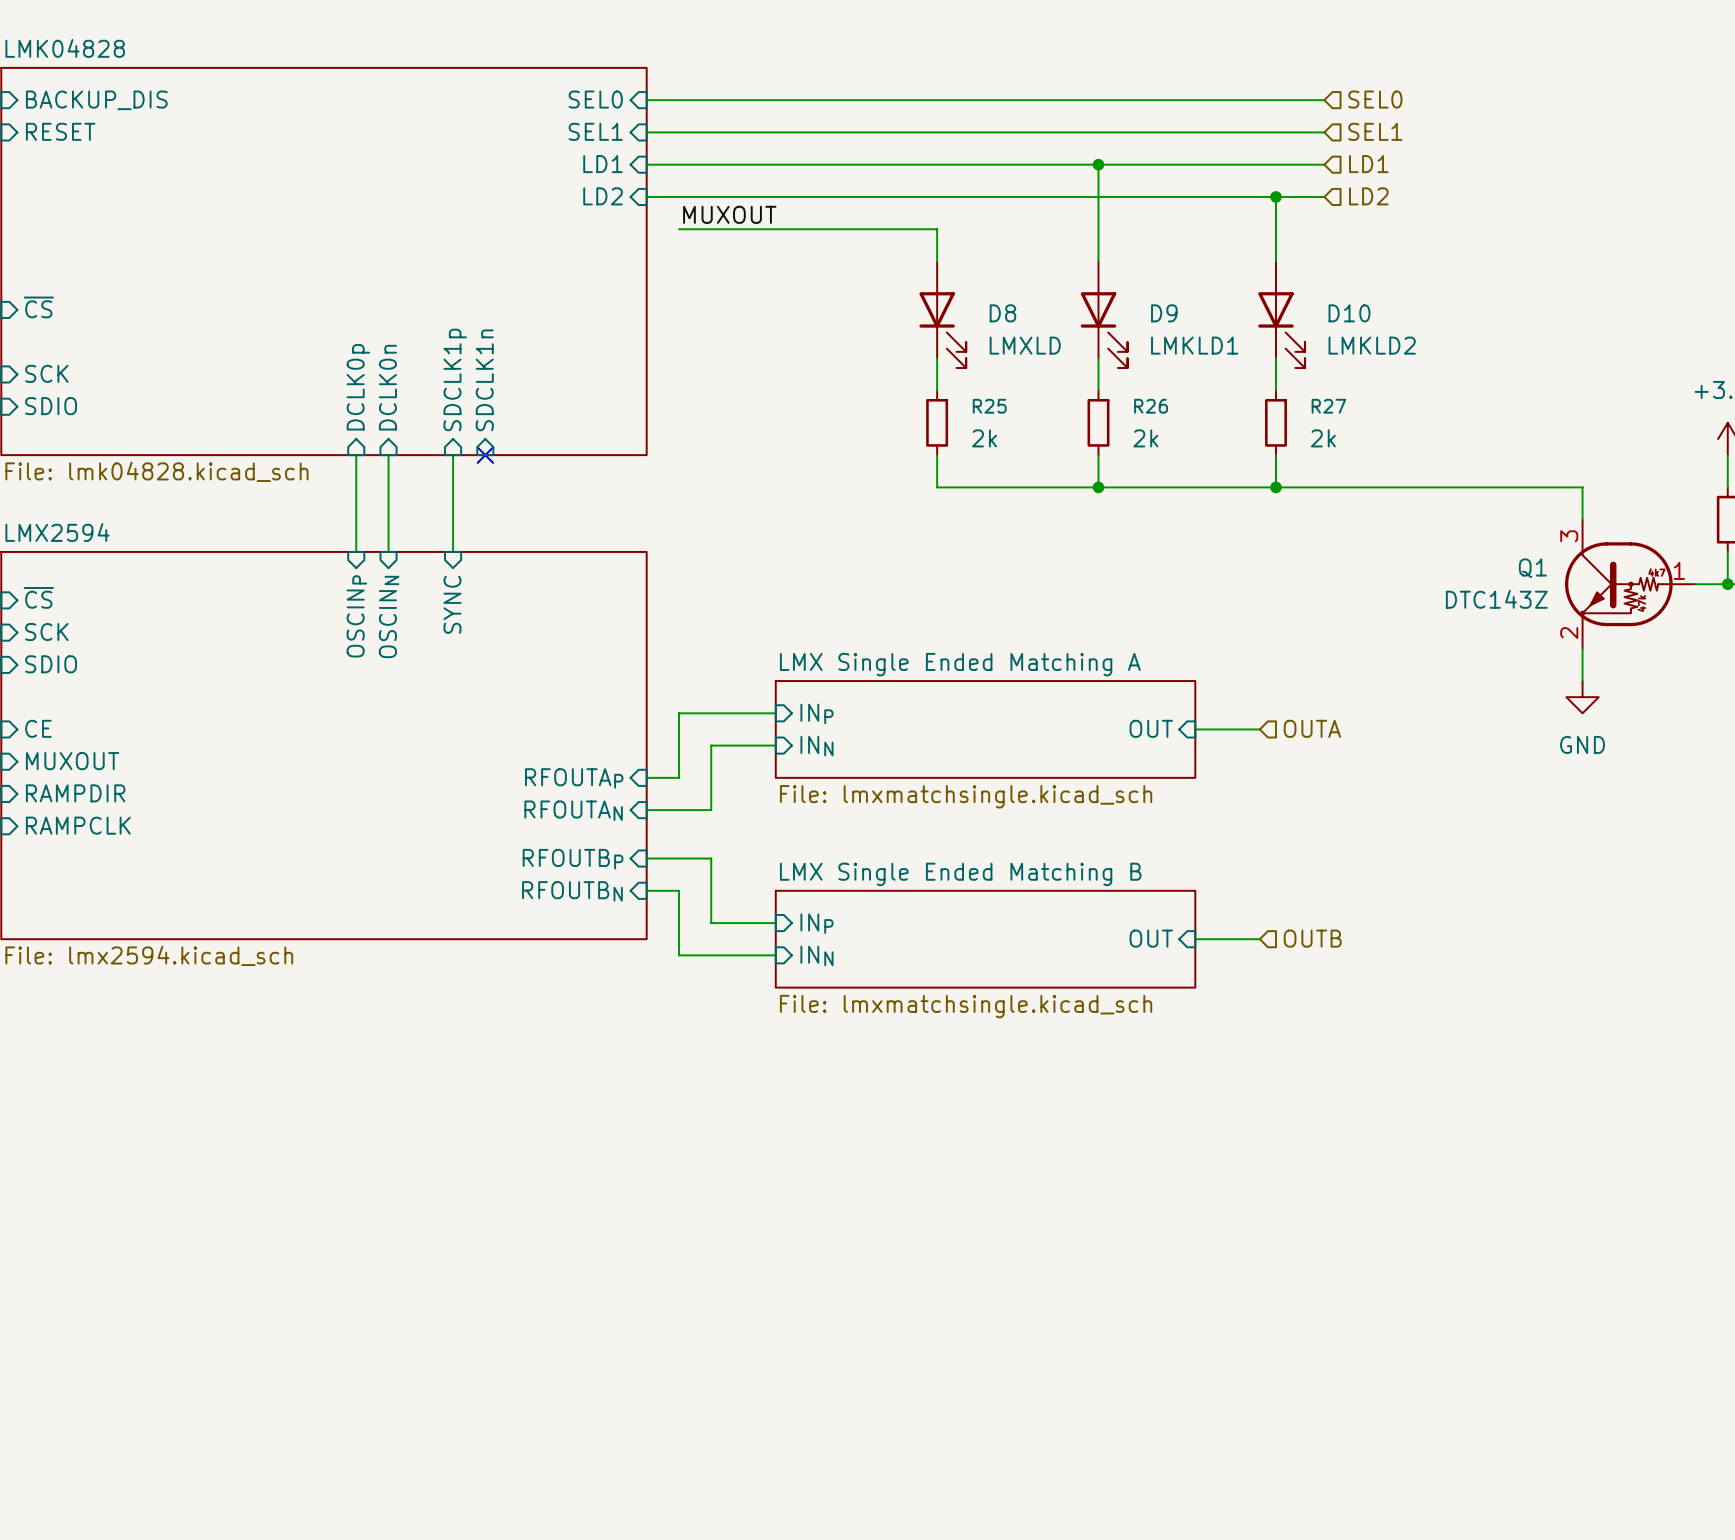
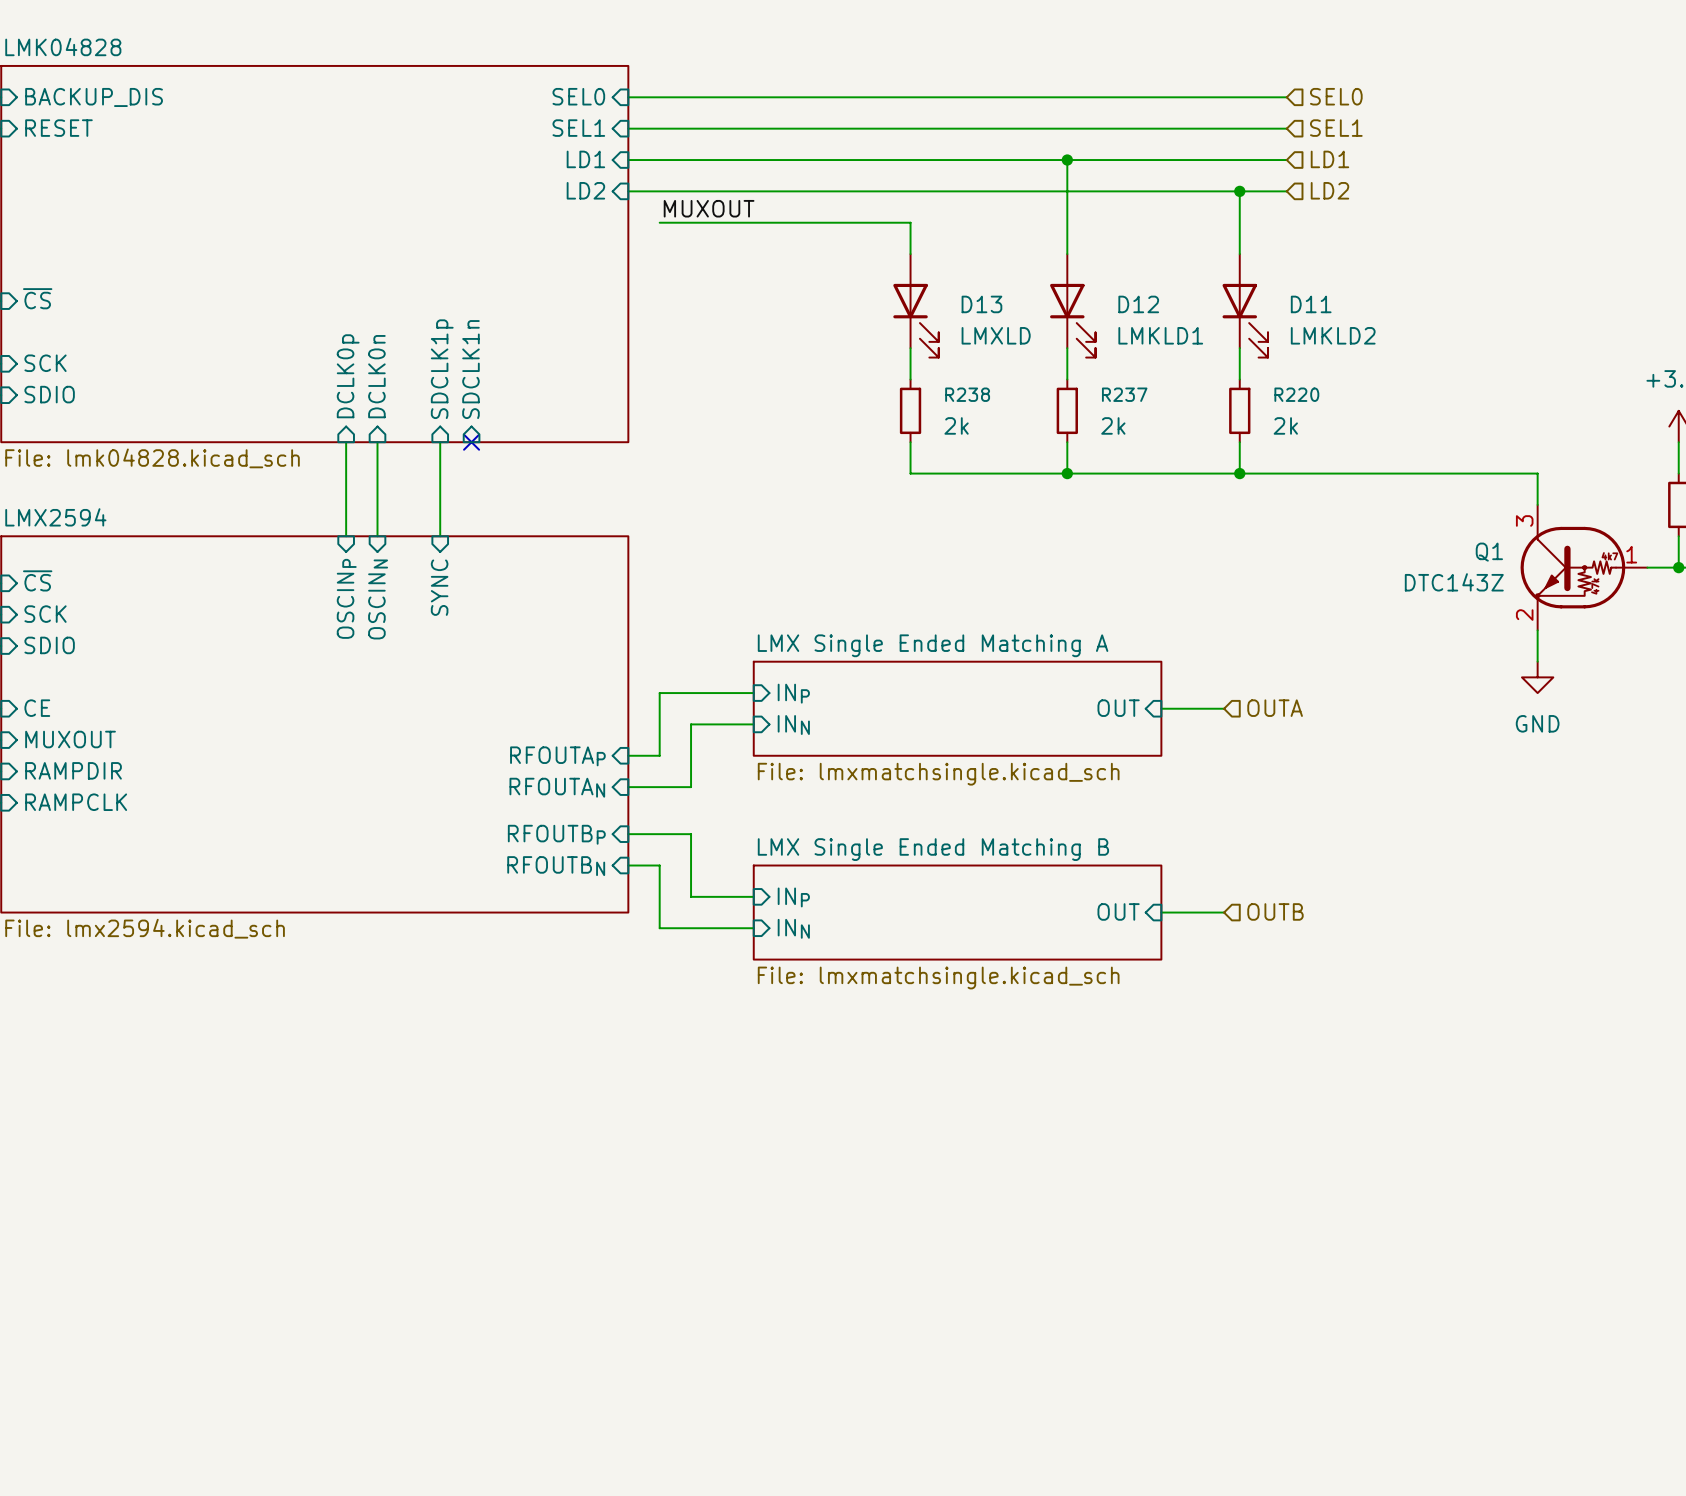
D8 name: D8 (1002, 313) -> D13 (981, 304)
D9 name: D9 (1164, 313) -> D12 (1138, 304)
D10 name: D10 (1349, 313) -> D11 (1311, 304)
R25 name: R25 (989, 406) -> R238 (967, 394)
R26 name: R26 (1151, 406) -> R237 (1124, 394)
R27 name: R27 (1328, 406) -> R220 (1296, 394)

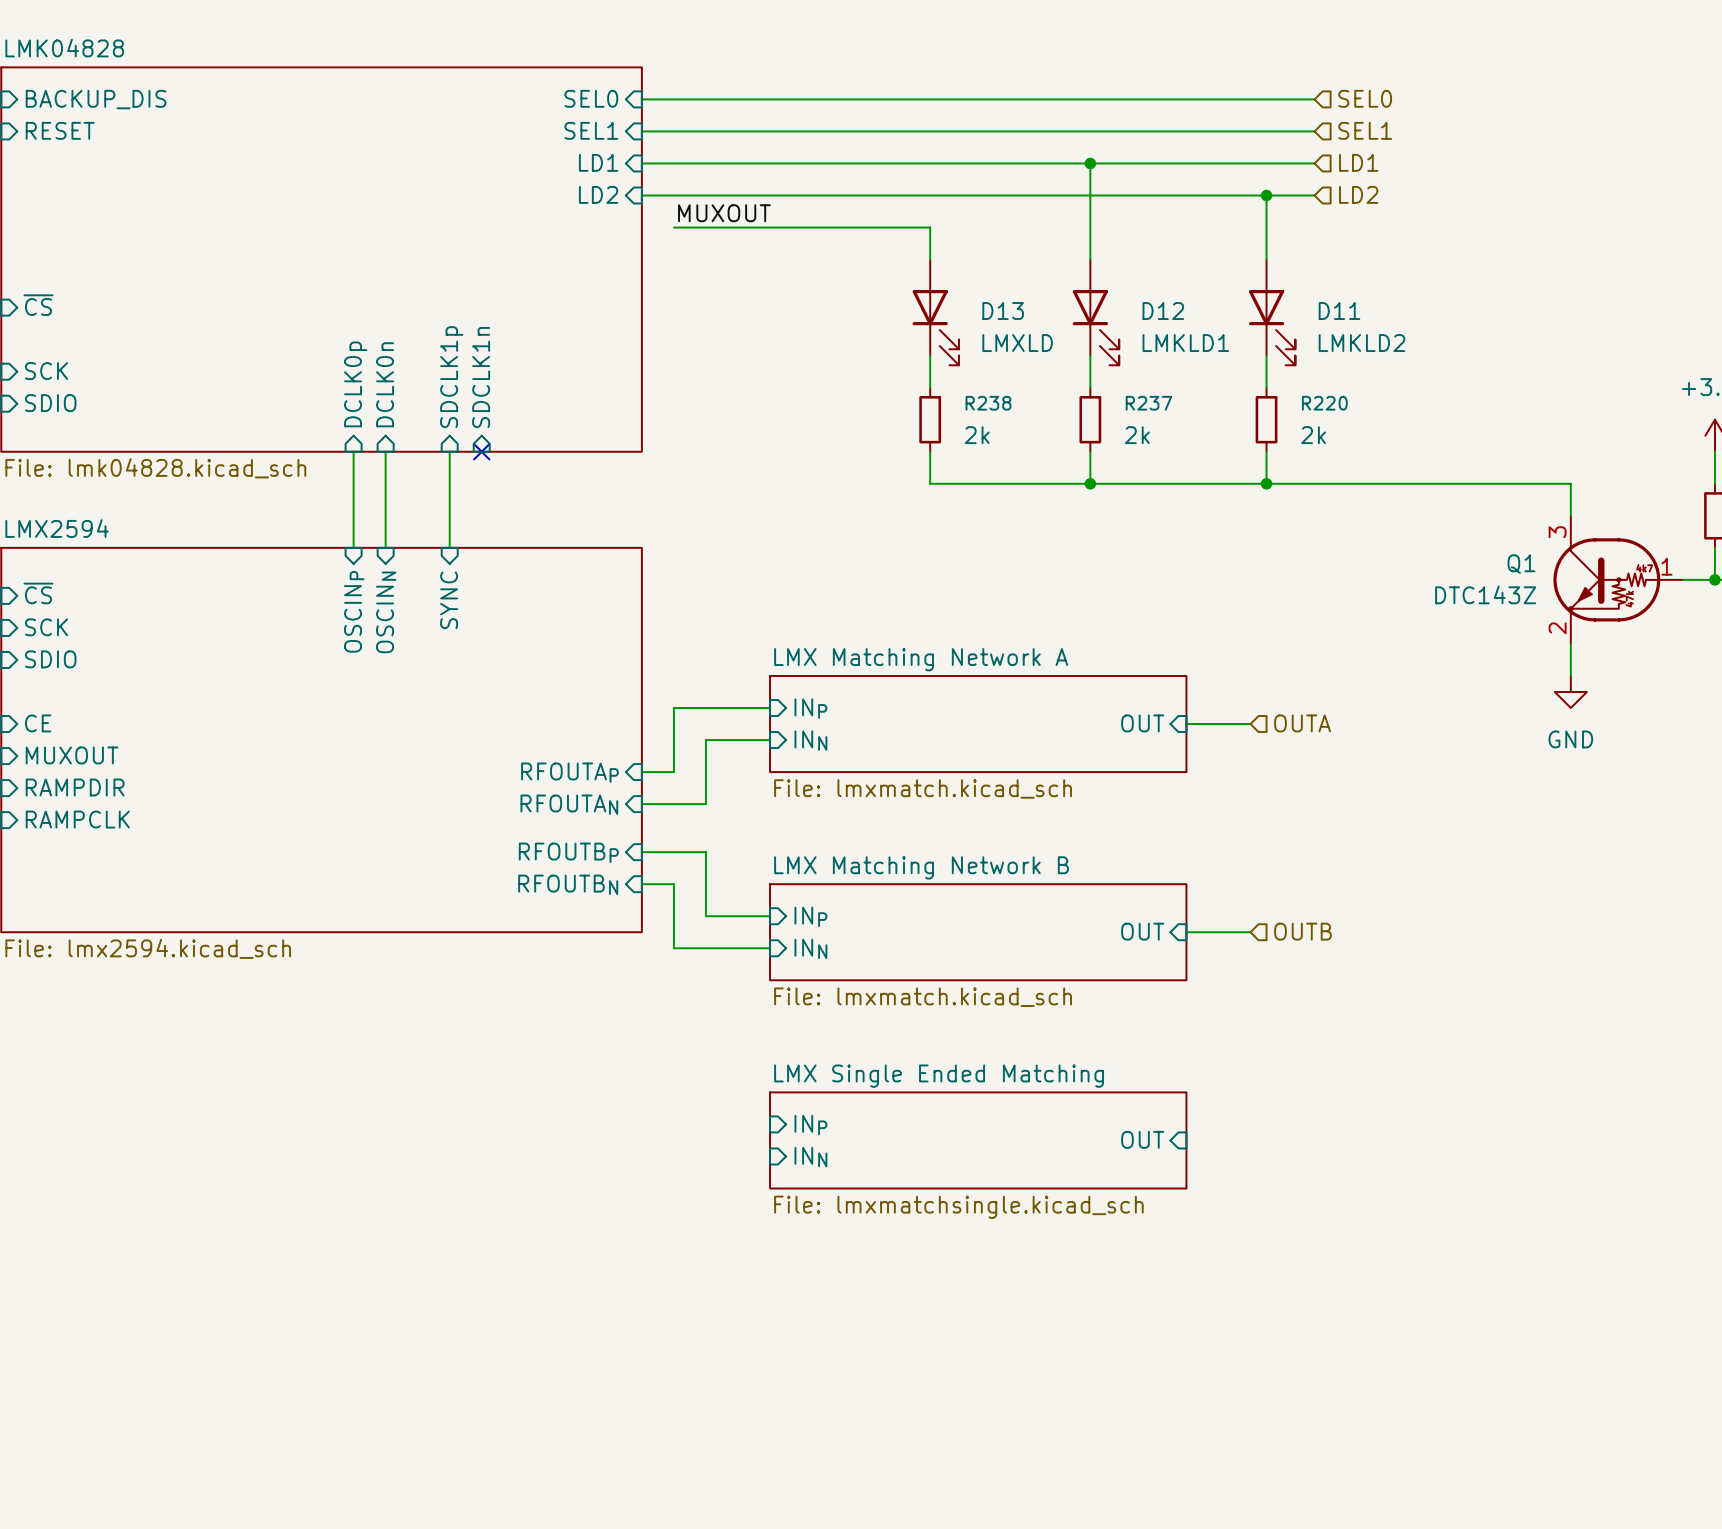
sheet LMX Single Ended Matching A name: LMX Single Ended Matching A (933, 645) -> LMX Matching Network A (921, 659)
sheet LMX Single Ended Matching A value: File: lmxmatchsingle.kicad_sch (938, 774) -> File: lmxmatch.kicad_sch (923, 788)
sheet LMX Single Ended Matching B name: LMX Single Ended Matching B (933, 849) -> LMX Matching Network B (921, 867)
sheet LMX Single Ended Matching B value: File: lmxmatchsingle.kicad_sch (938, 977) -> File: lmxmatch.kicad_sch (923, 997)
sheet pin: none -> INP (810, 1125)
sheet pin: none -> OUT (1142, 1139)
sheet LMX Single Ended Matching: none -> File: lmxmatchsingle.kicad_sch (978, 1140)
sheet pin: none -> INN (810, 1157)

